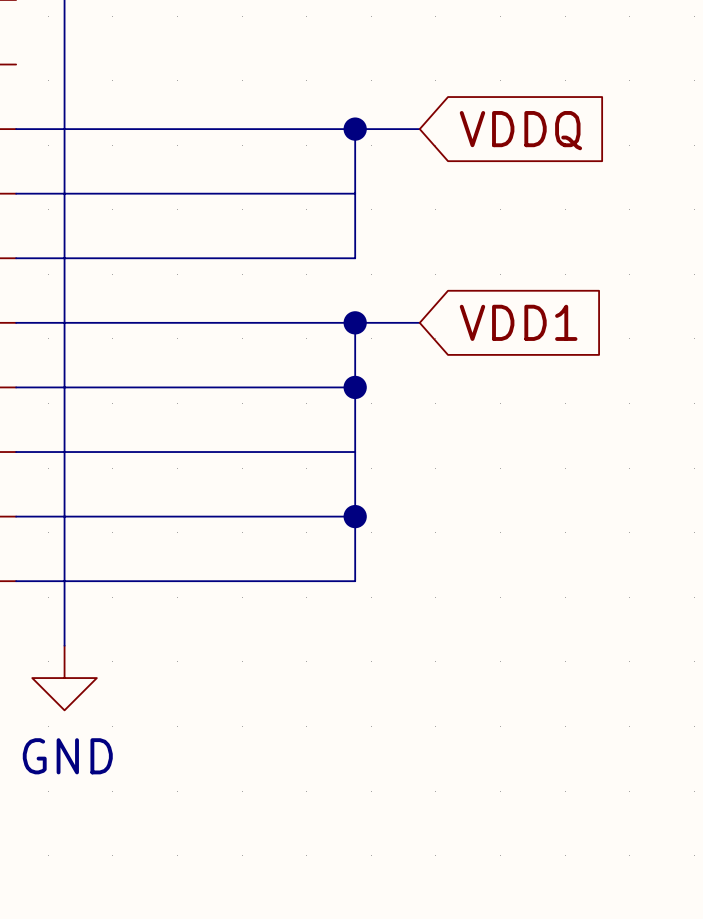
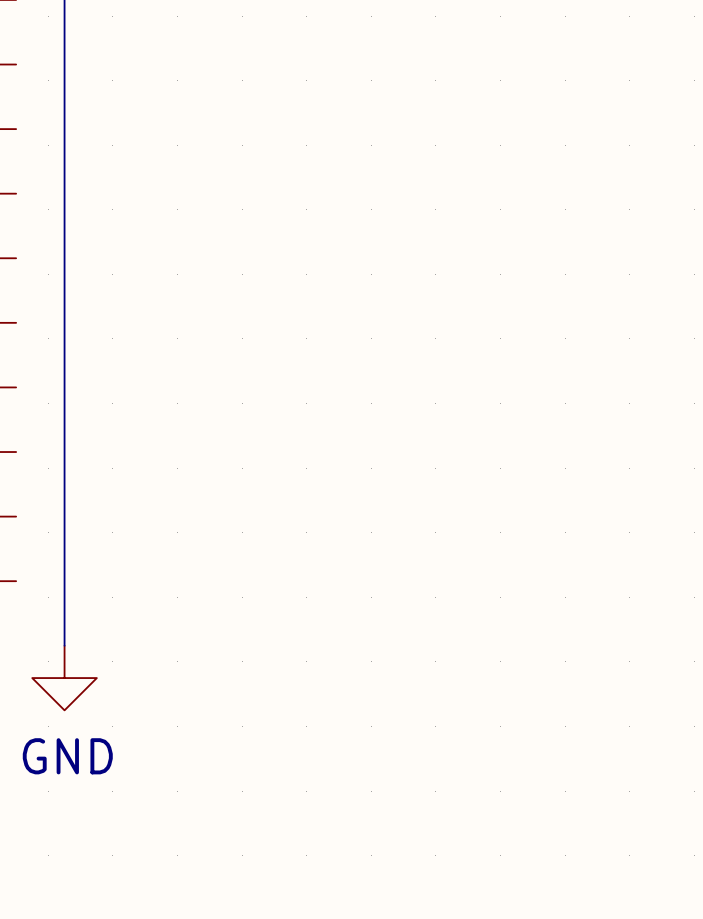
wire: (16, 129) (419, 129) -> none
wire: (355, 129) (355, 258) (16, 258) -> none
junction: (355, 129) -> none
global label: VDDQ (520, 130) -> none
wire: (16, 193) (355, 193) -> none
wire: (16, 322) (419, 322) -> none
wire: (355, 322) (355, 581) (16, 581) -> none
junction: (355, 322) -> none
global label: VDD1 (518, 322) -> none
wire: (16, 387) (355, 387) -> none
junction: (355, 387) -> none
wire: (16, 452) (355, 452) -> none
wire: (16, 516) (355, 516) -> none
junction: (355, 516) -> none

